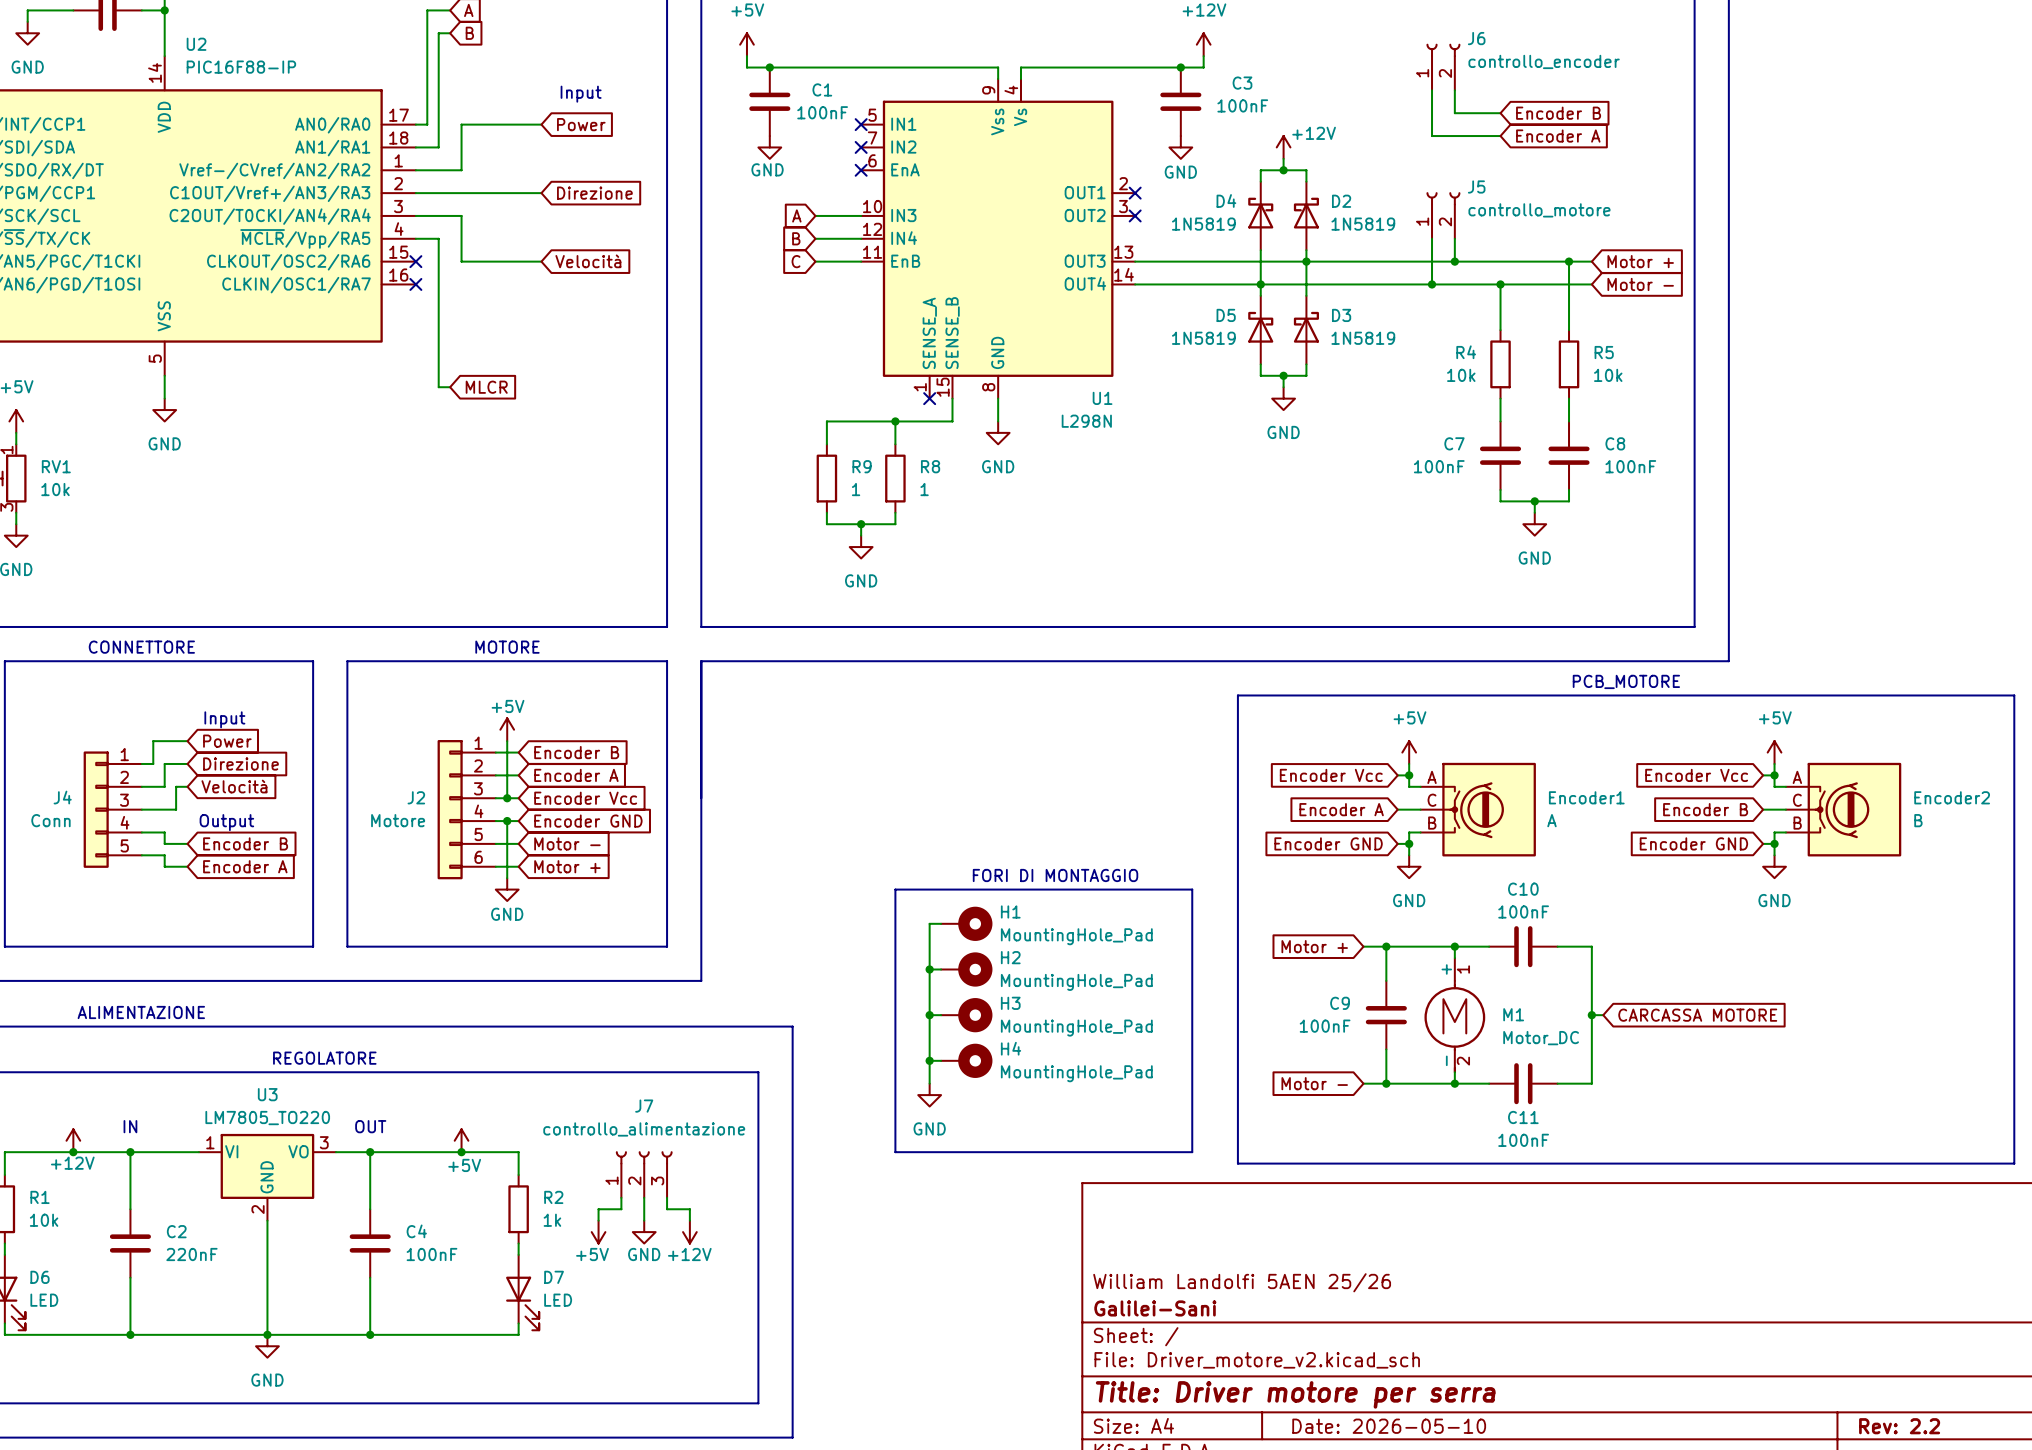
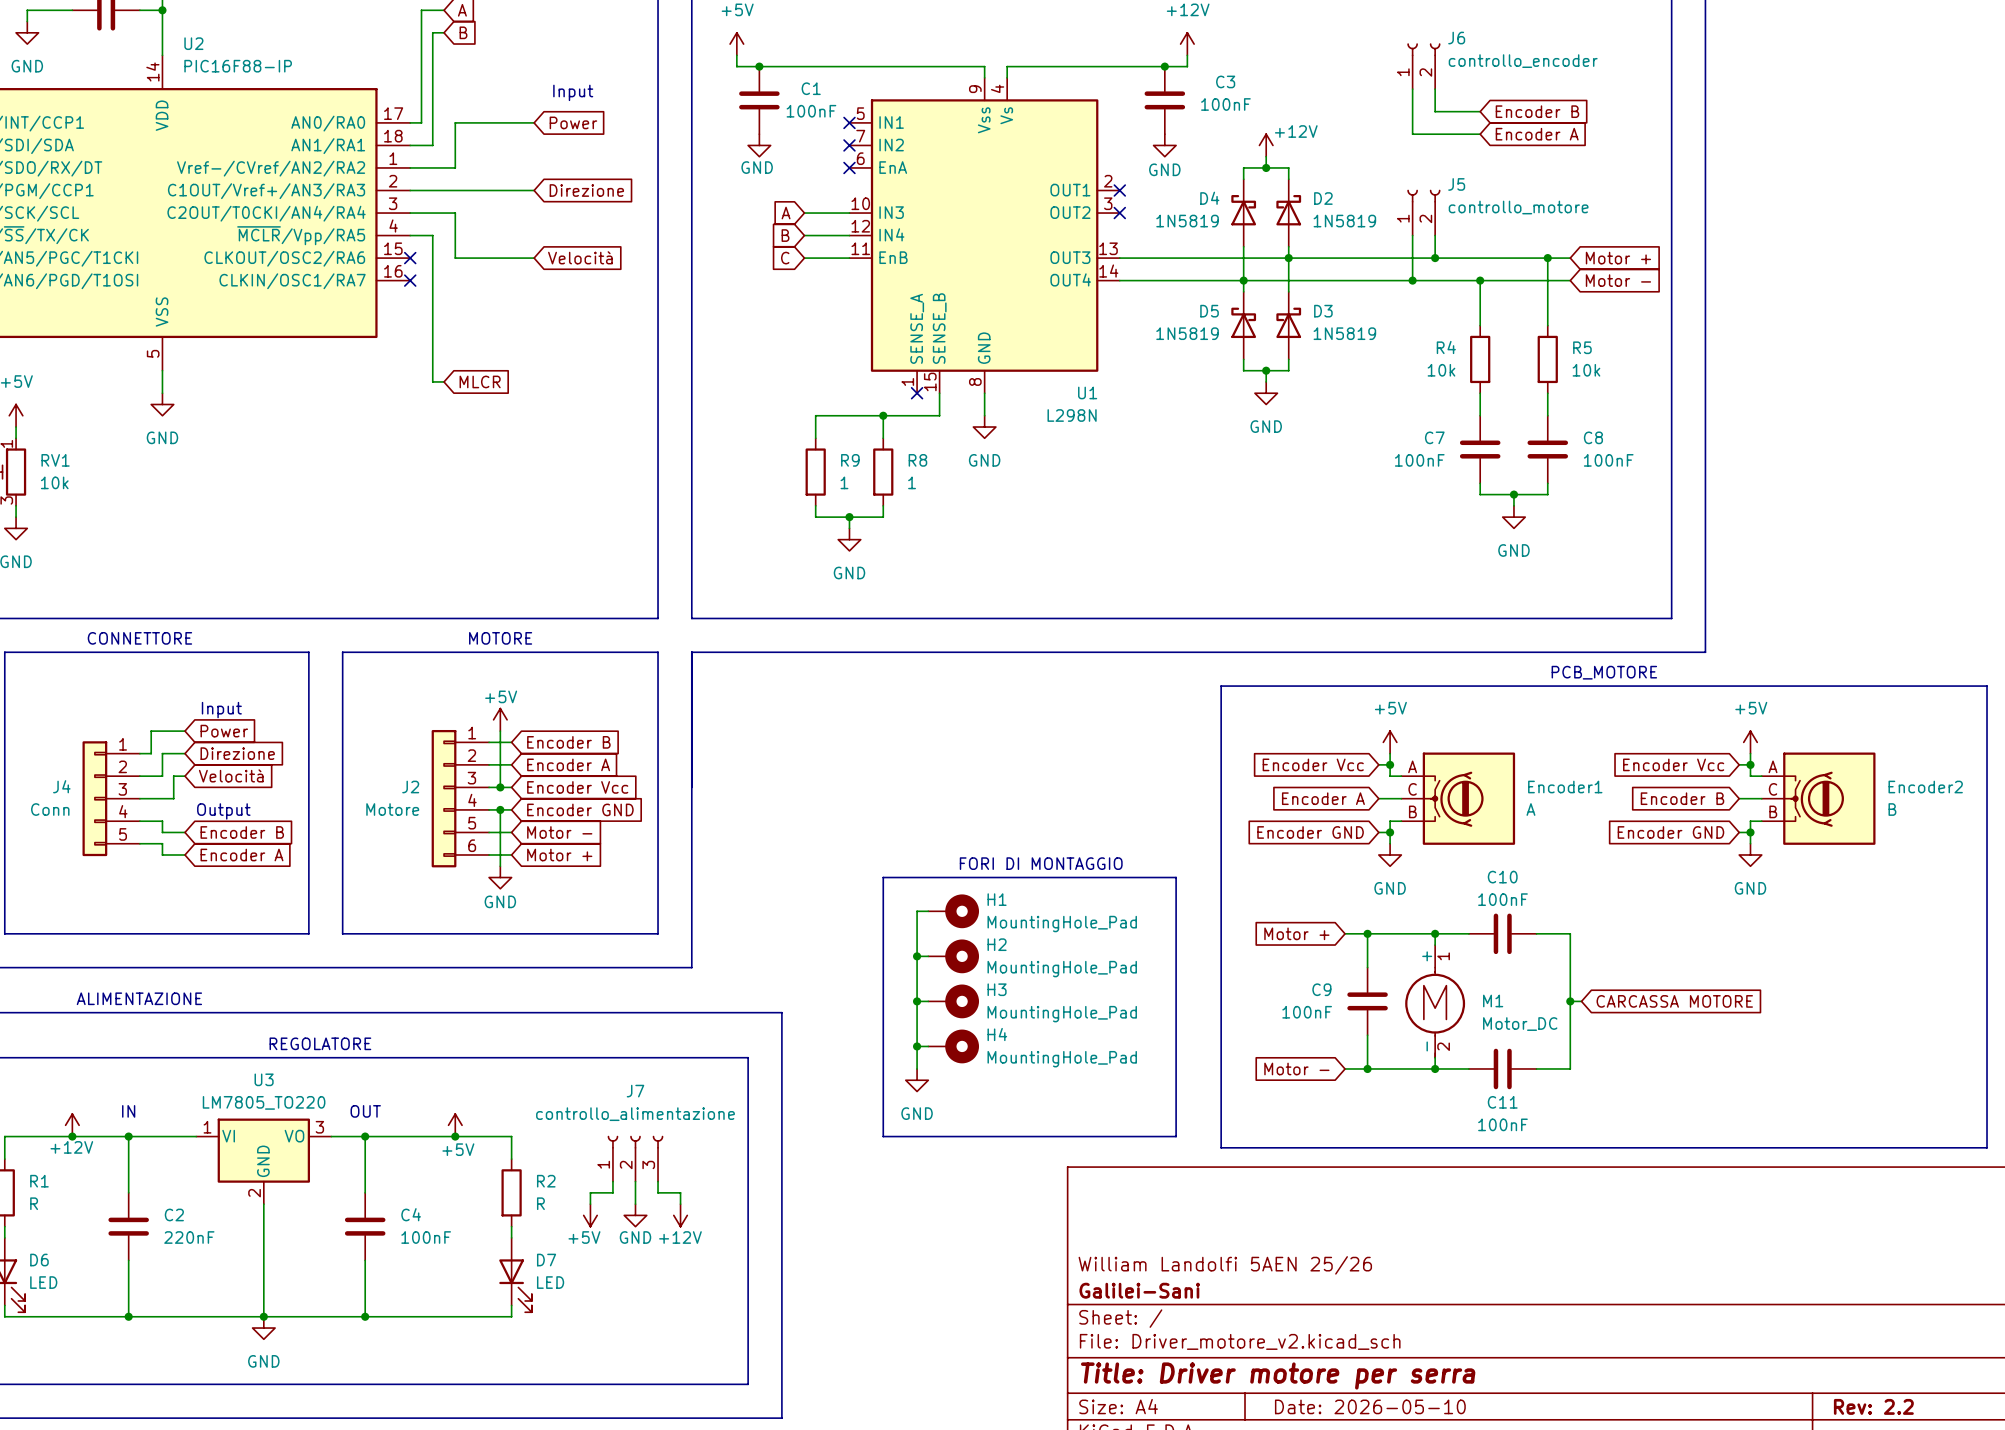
R1 value: 10k (44, 1220) -> R (34, 1203)
R2 value: 1k (552, 1220) -> R (540, 1203)

